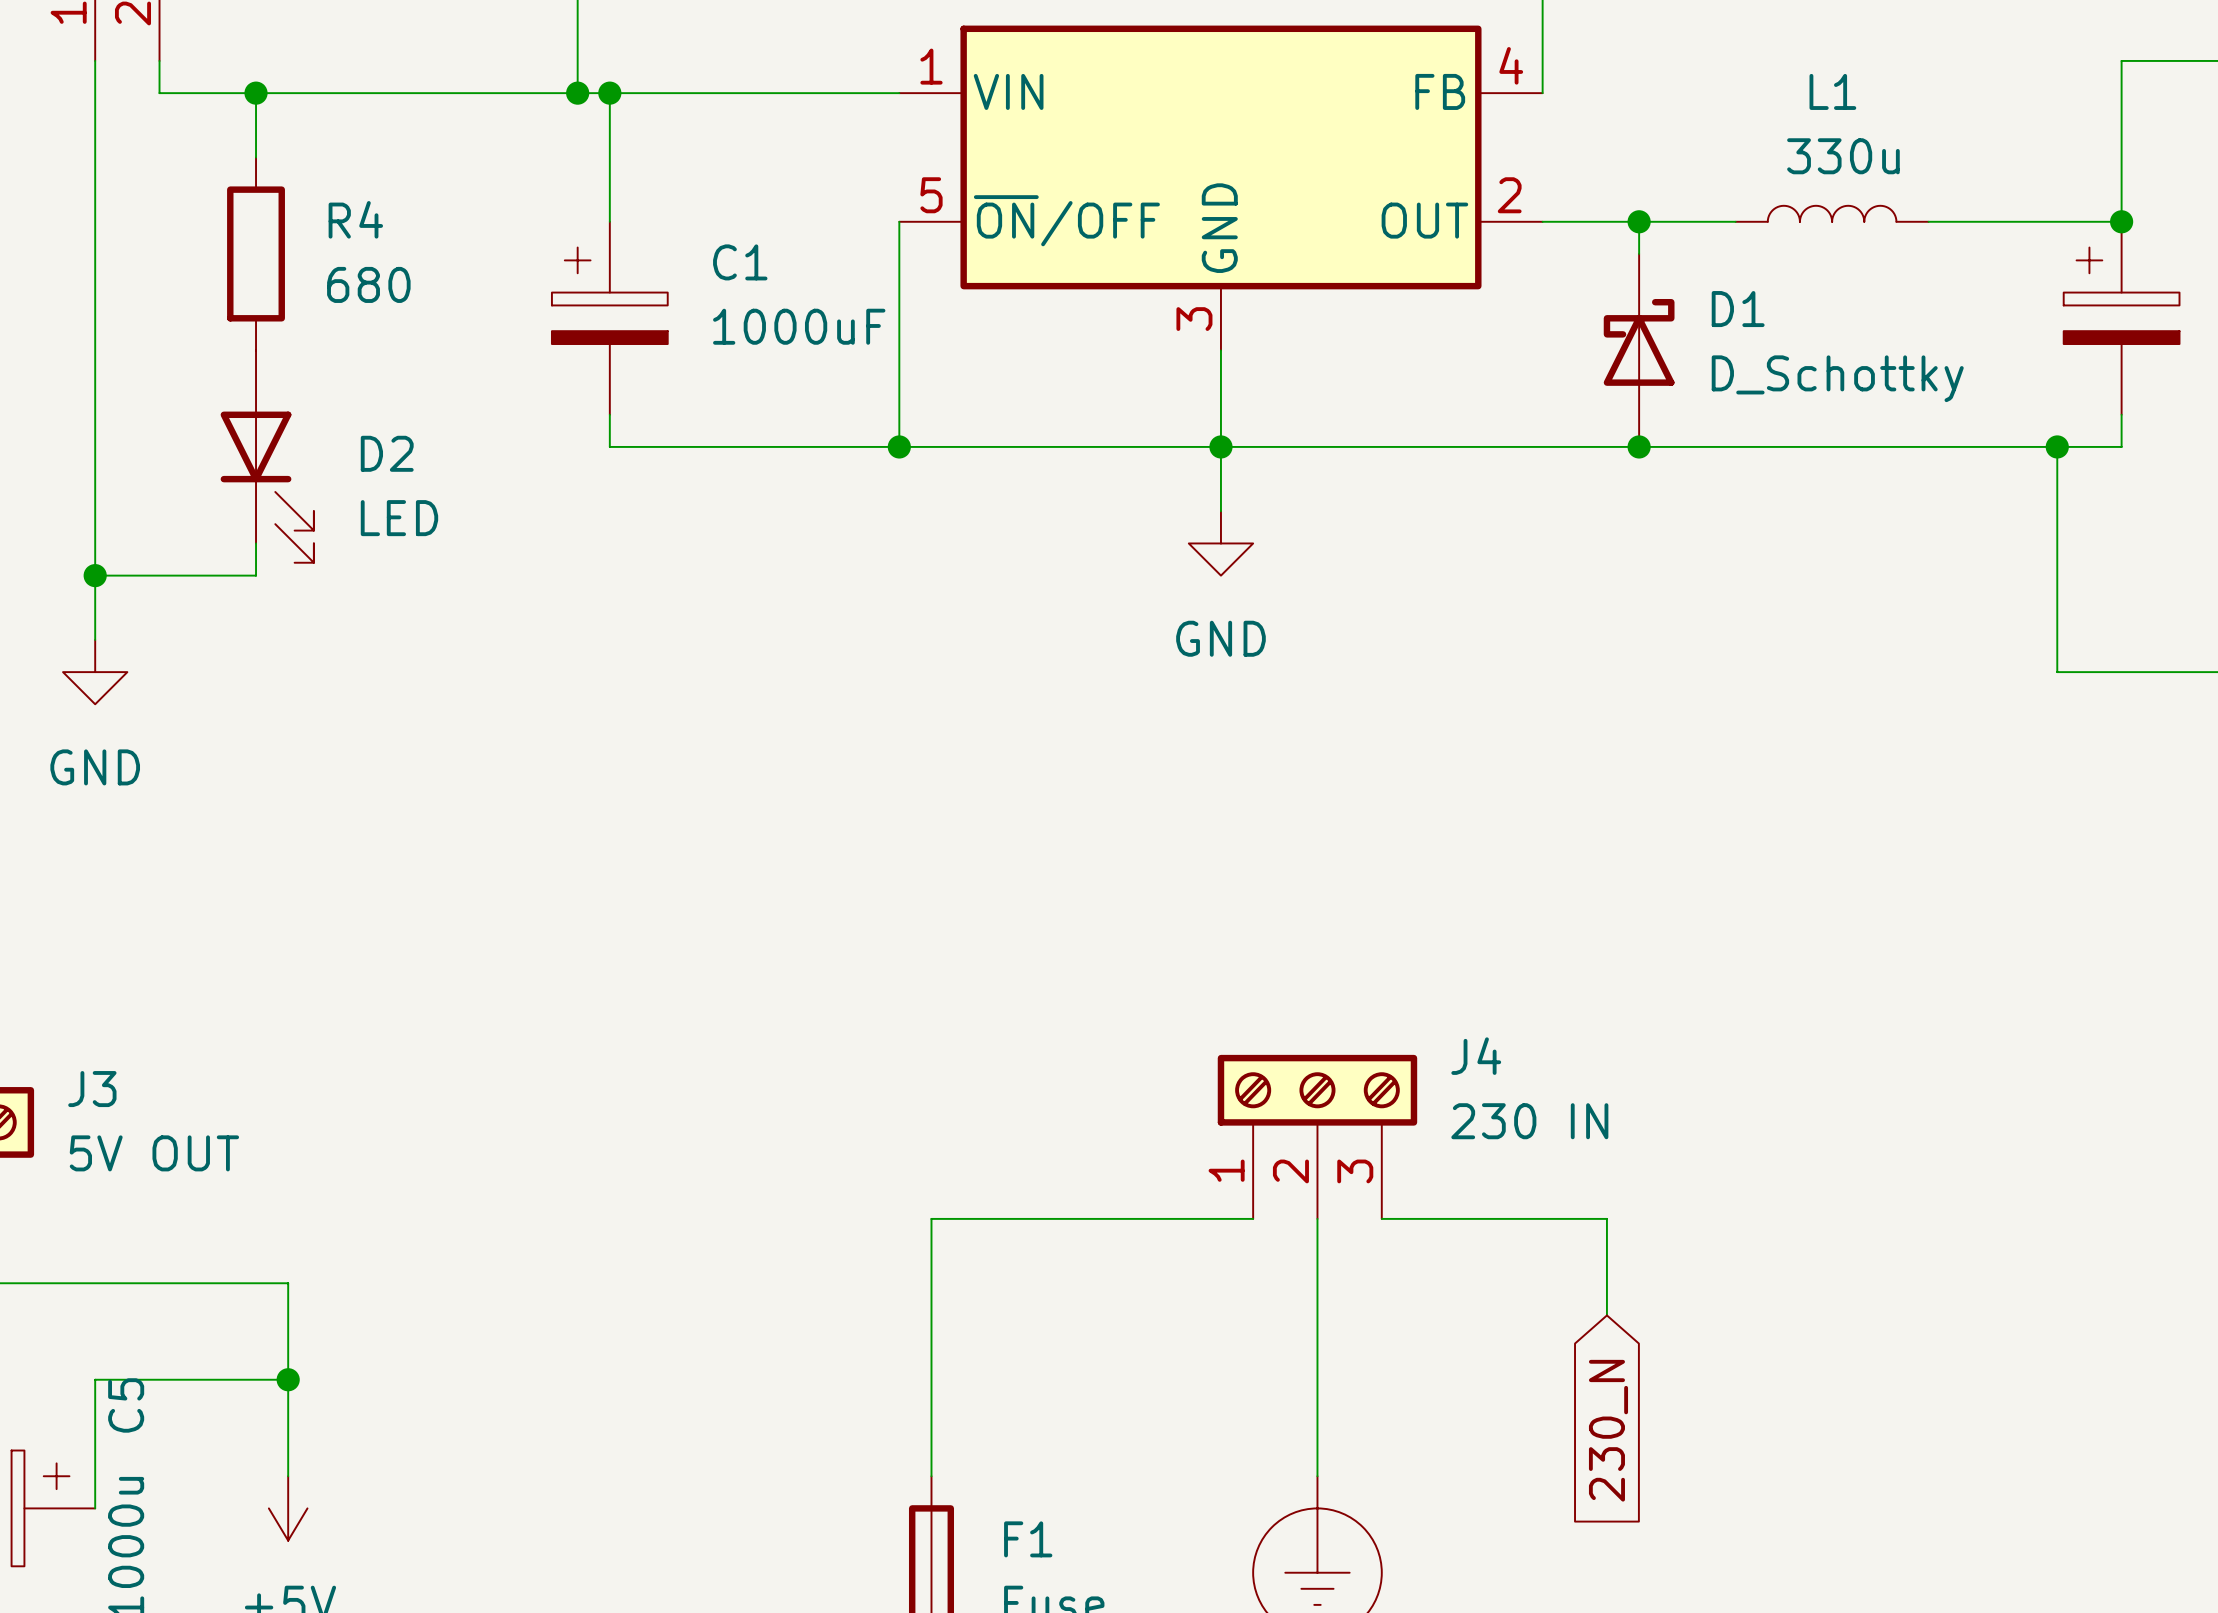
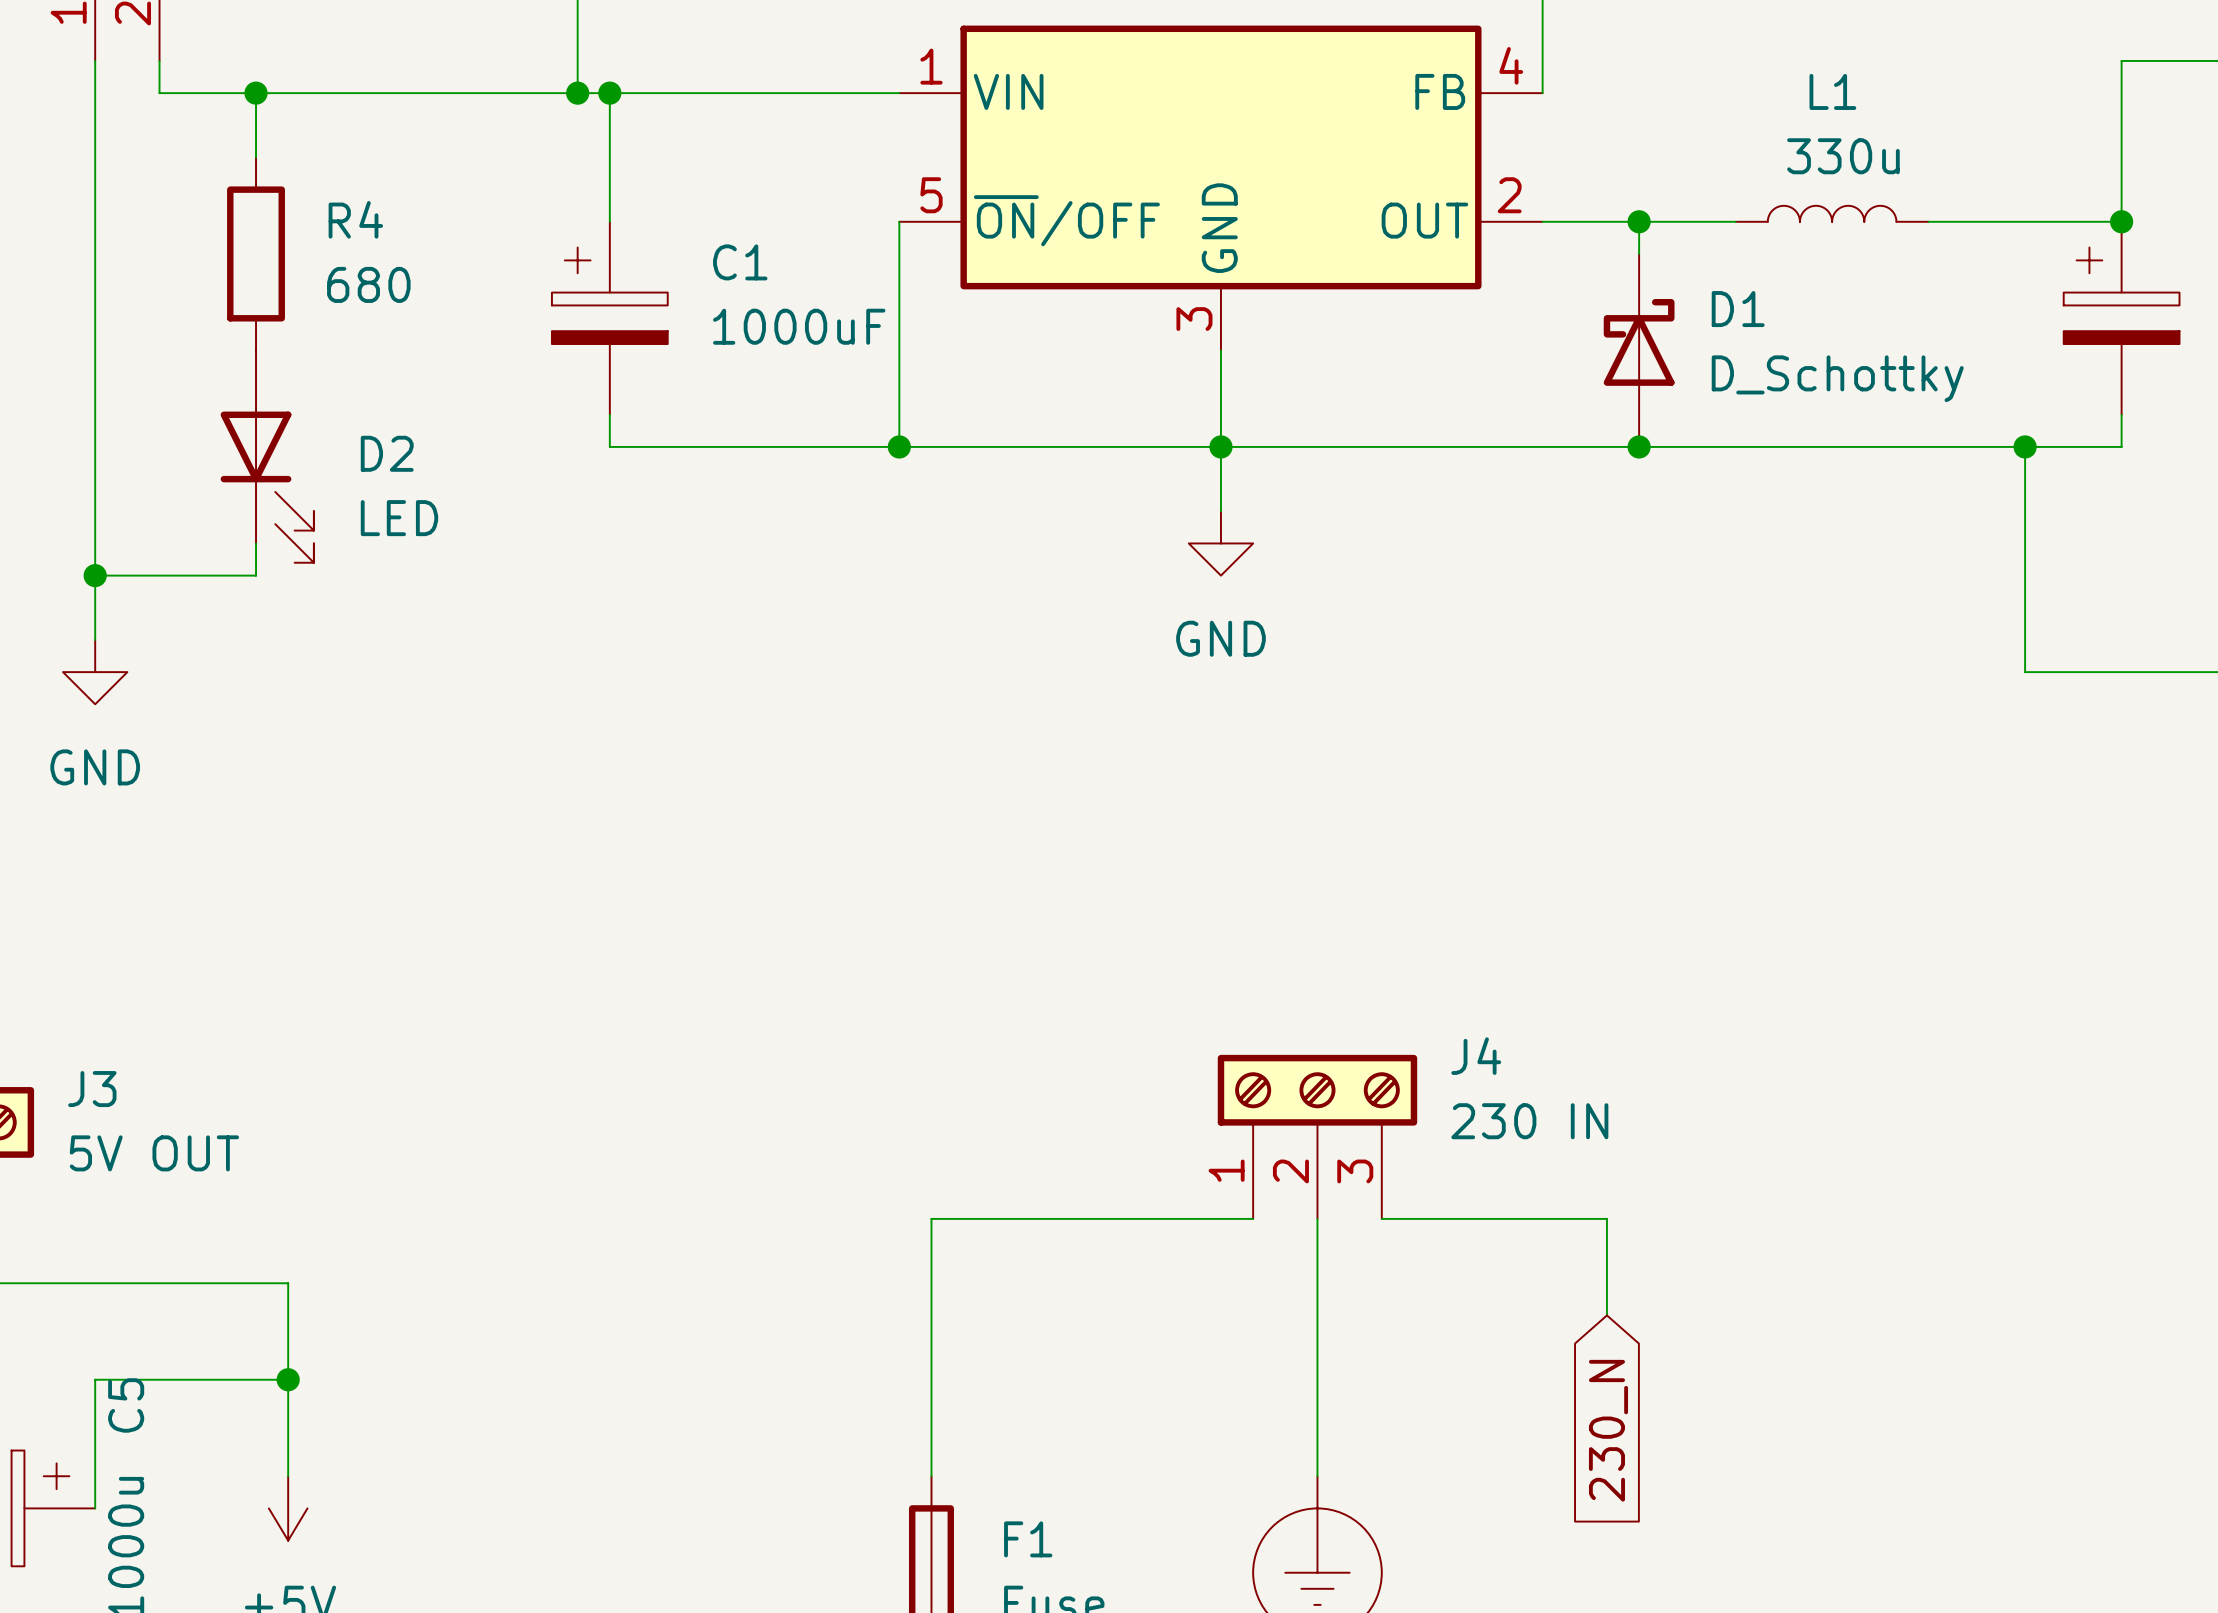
wire: (2057, 446) (2057, 672) -> (2025, 446) (2025, 672) (2057, 672)
junction position: (2057, 446) -> (2025, 446)

